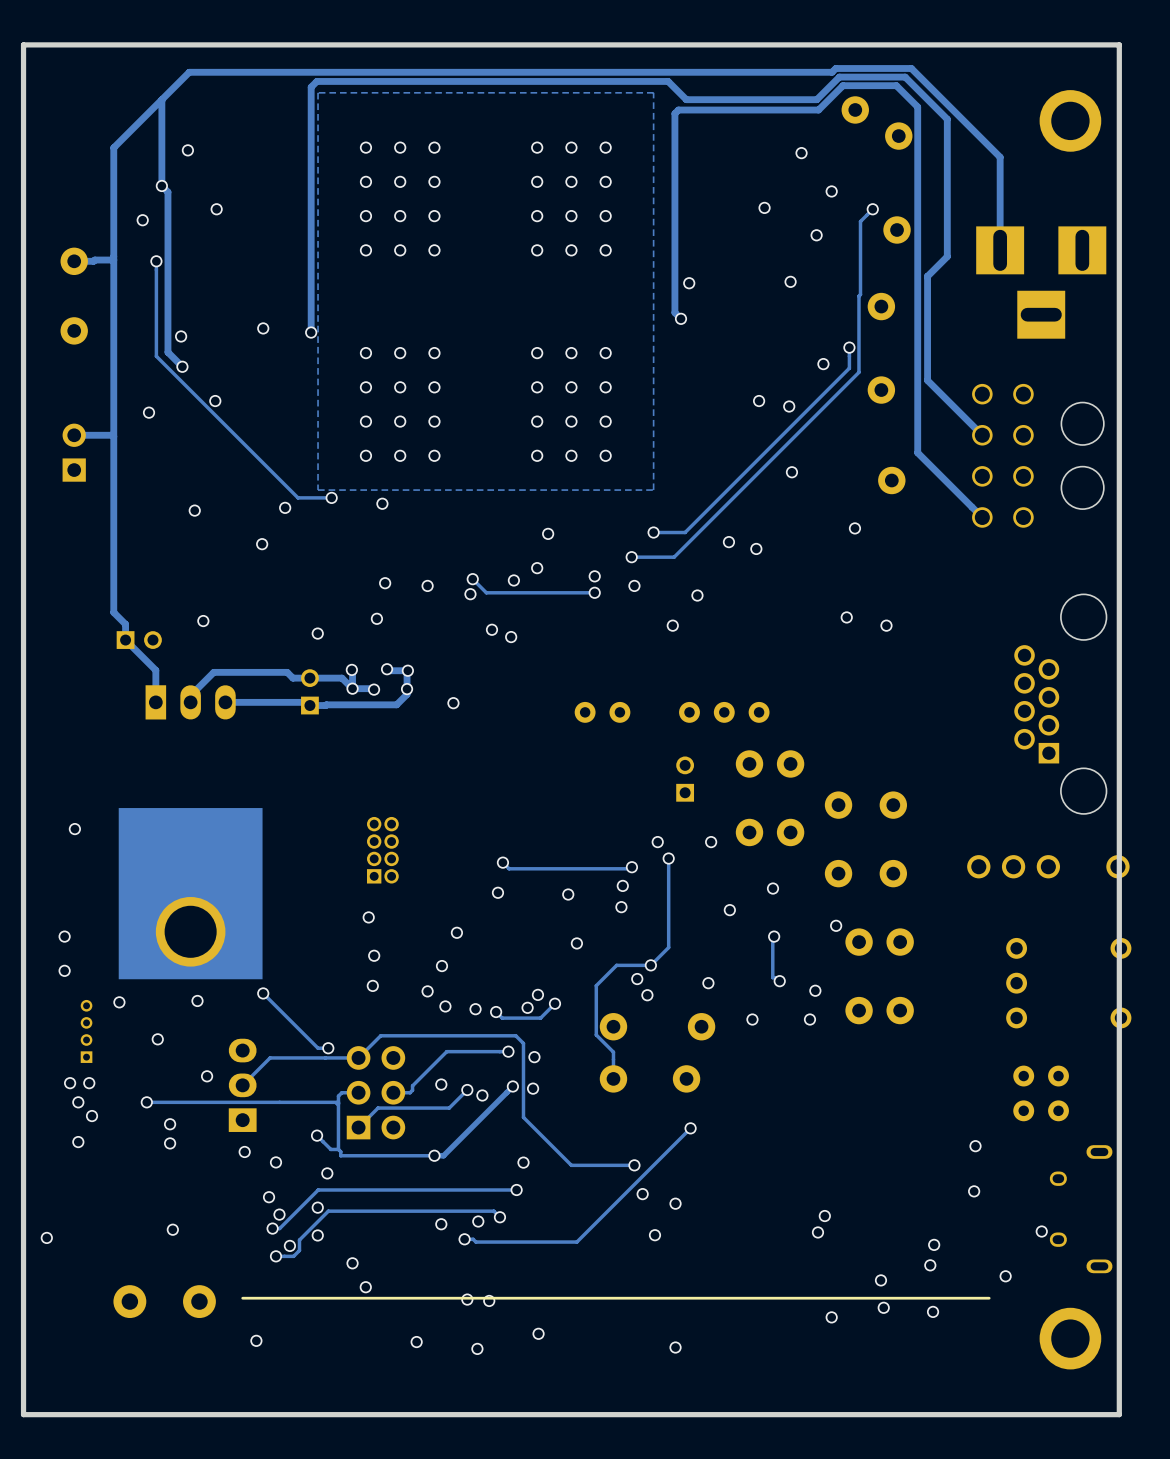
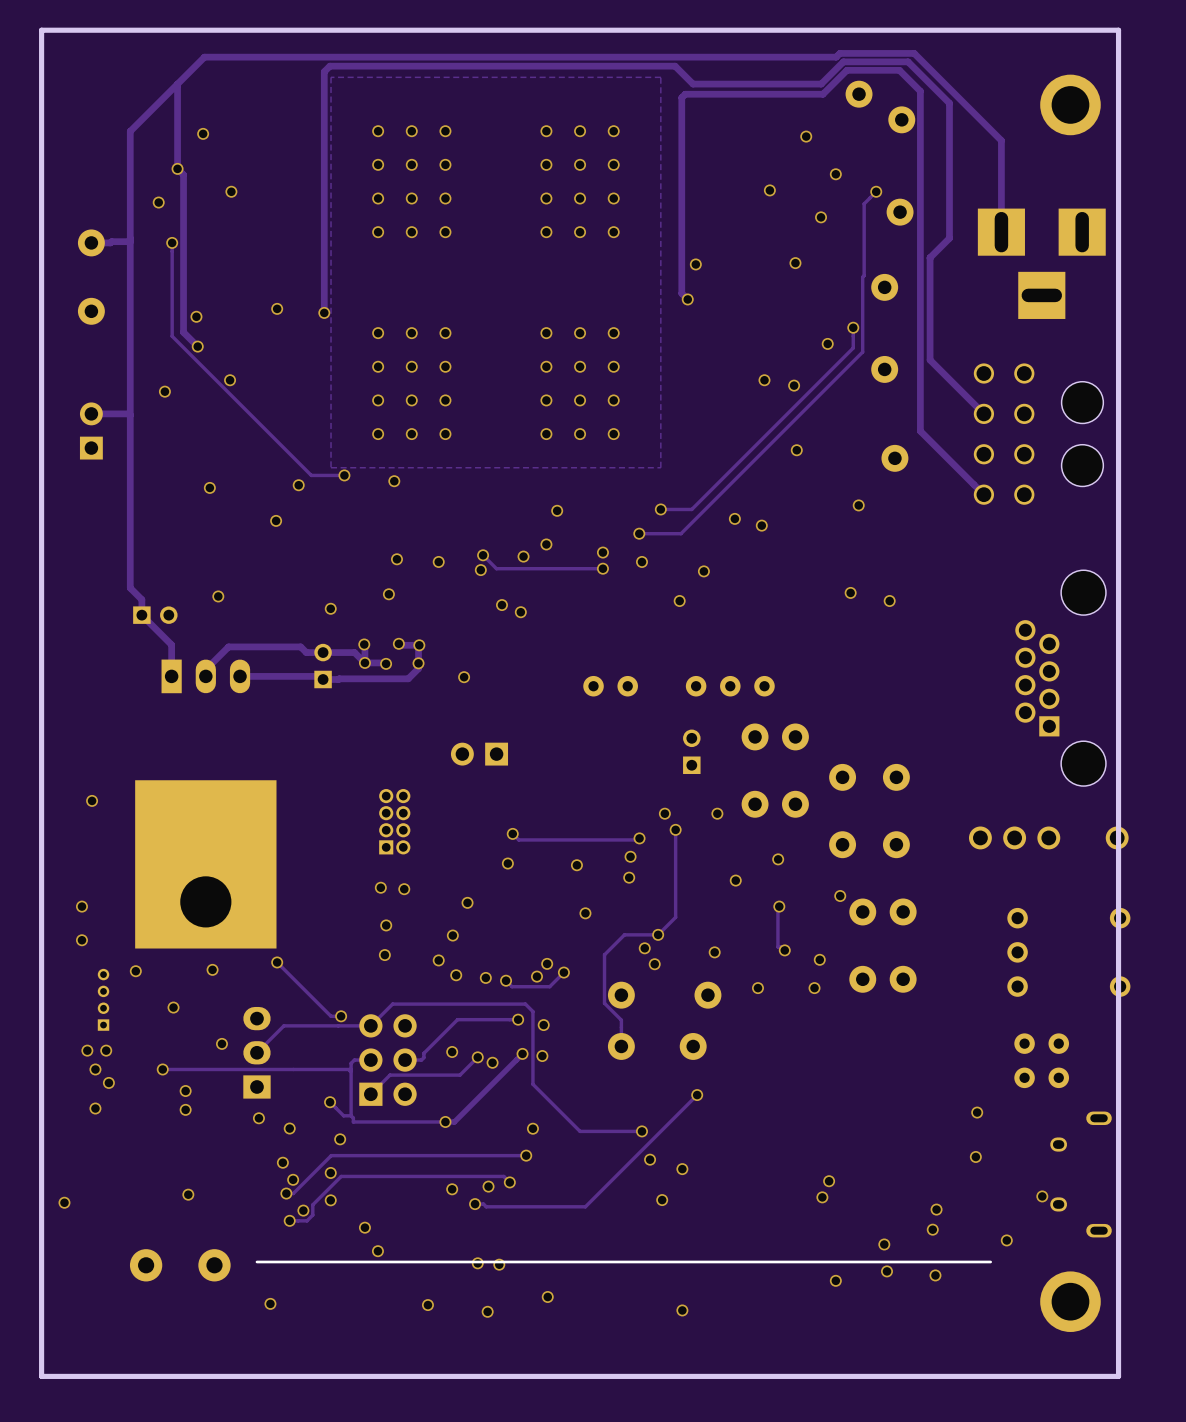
part: none -> (479, 754)
via: none -> (404, 889)

